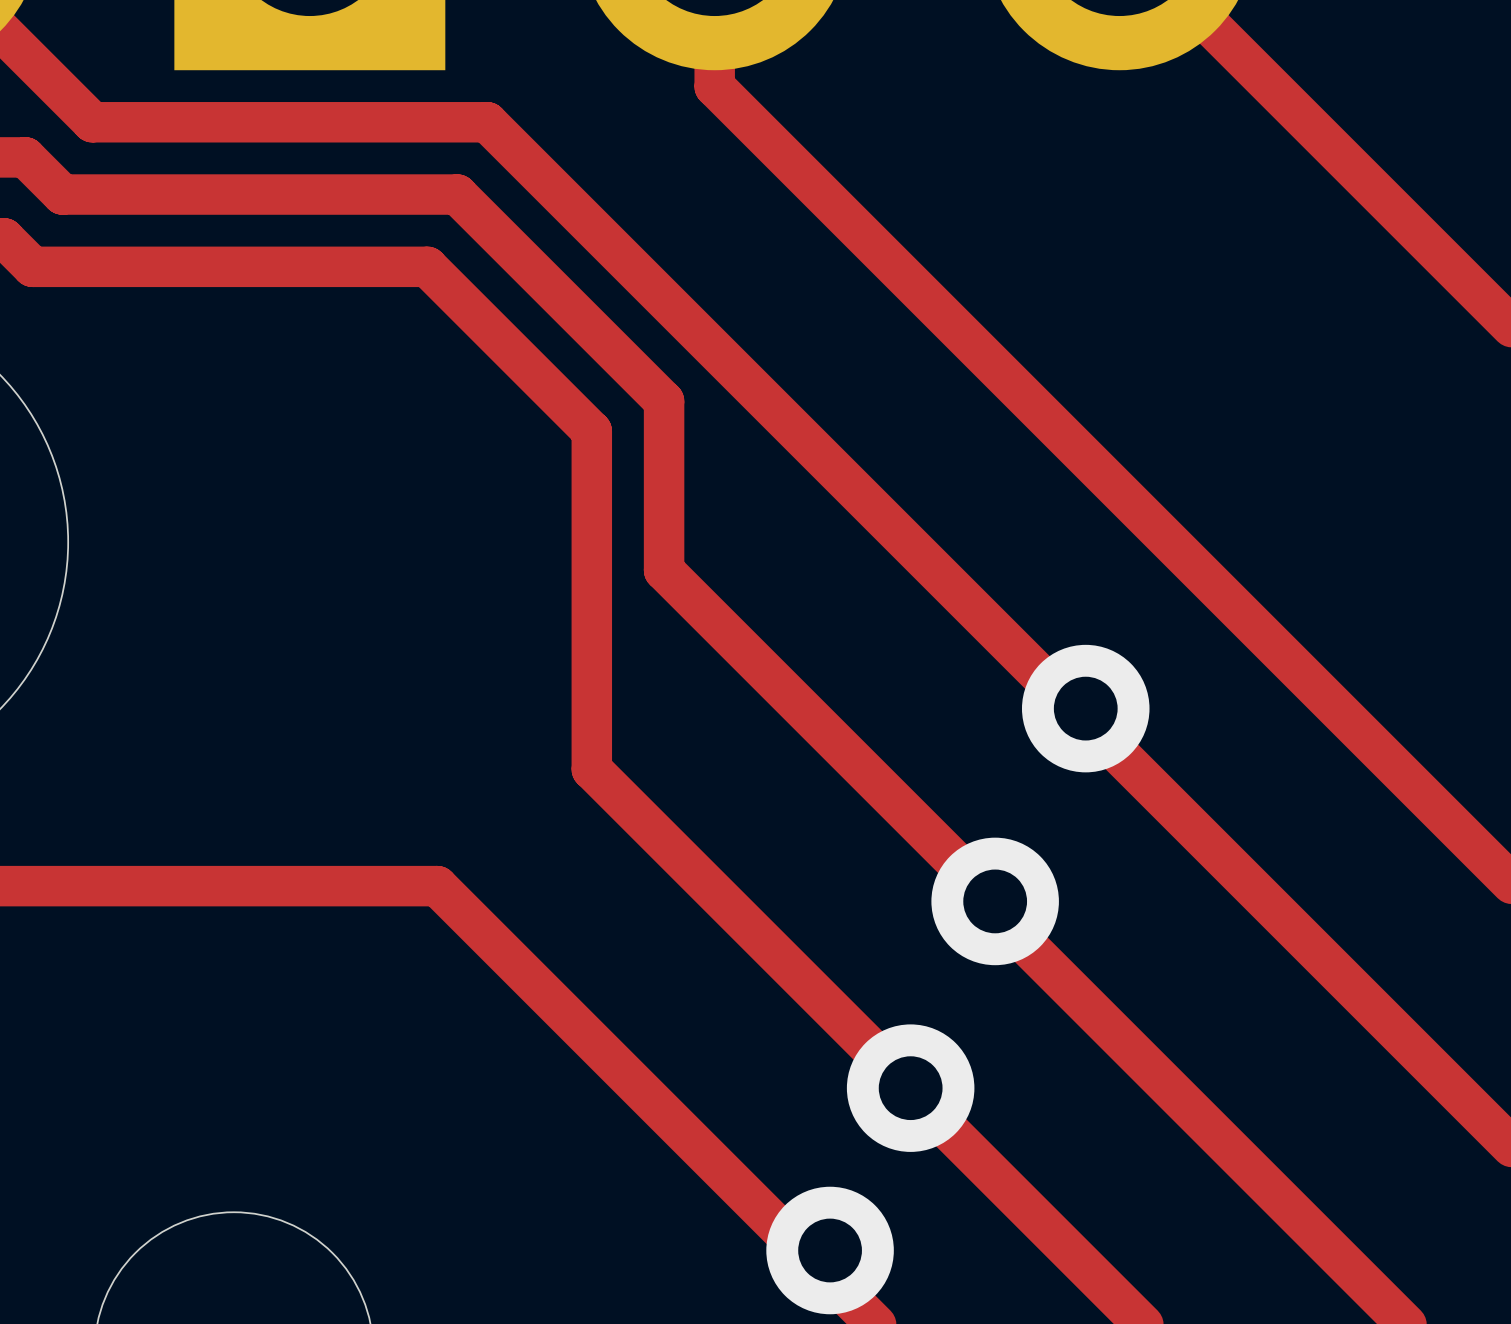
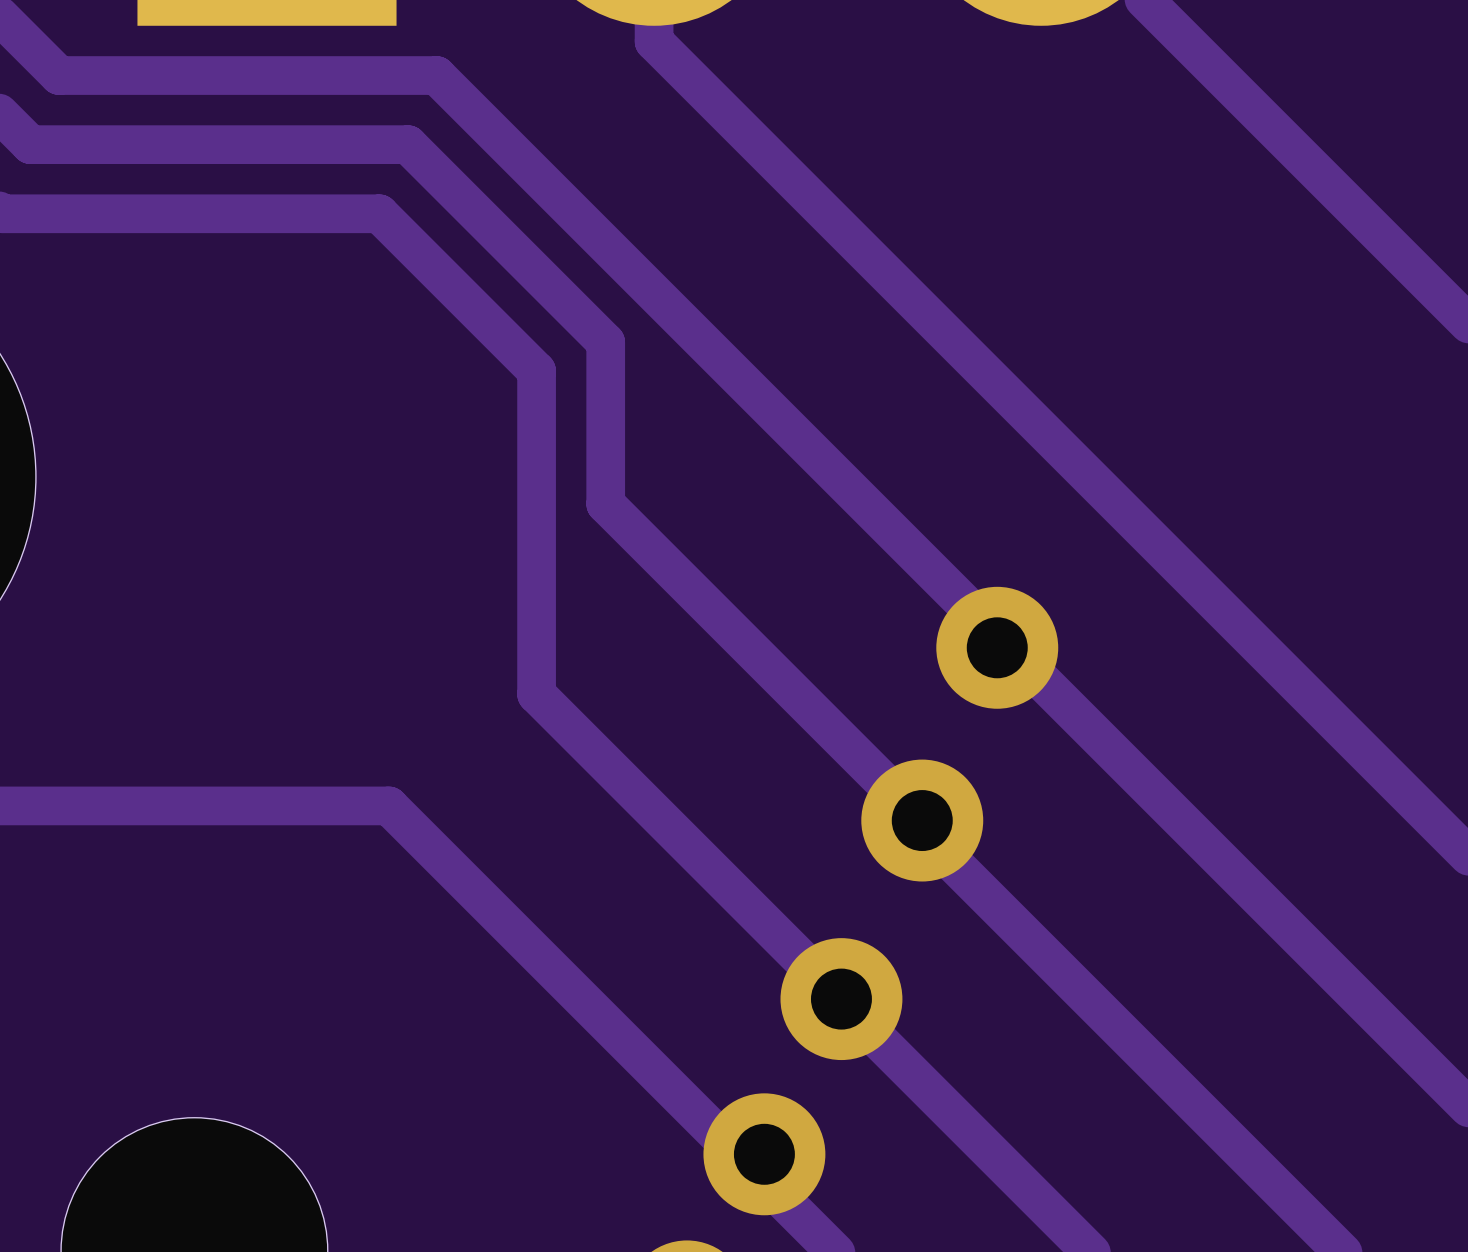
via position: (1085, 708) -> (997, 647)

